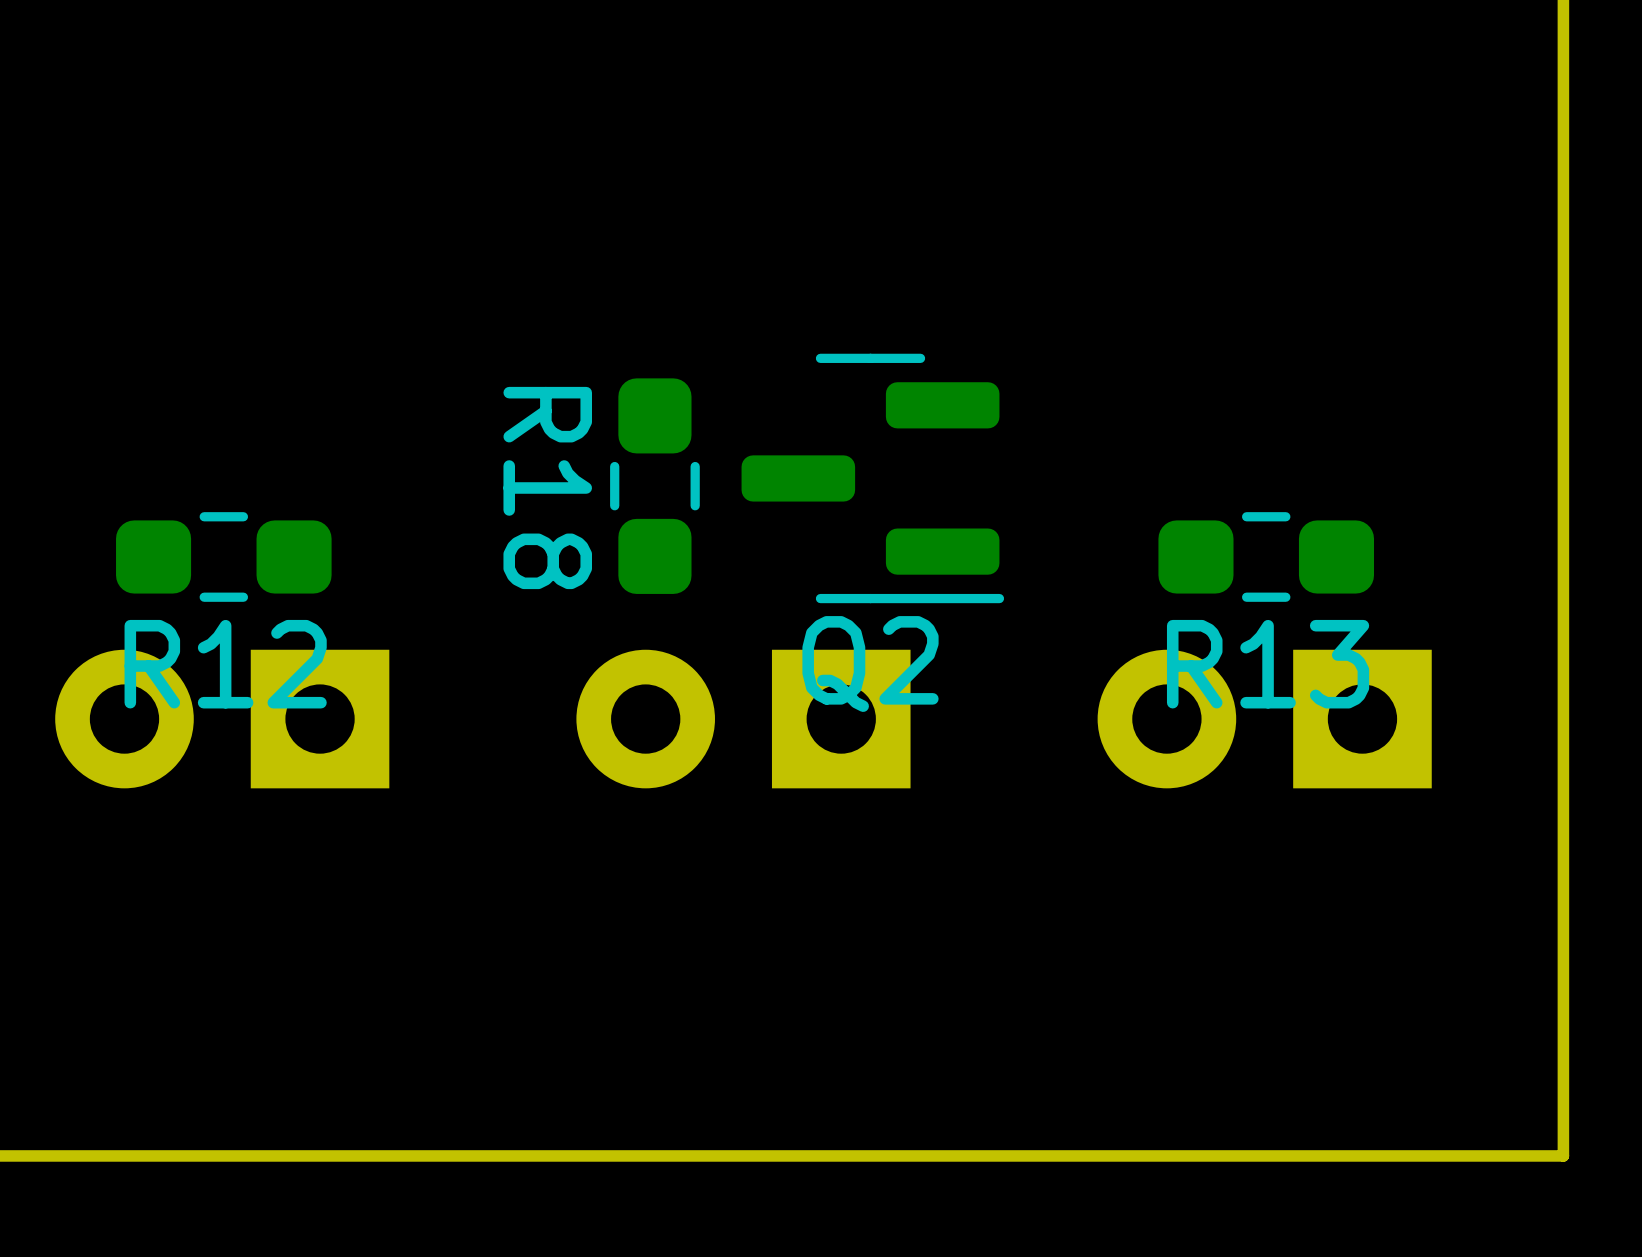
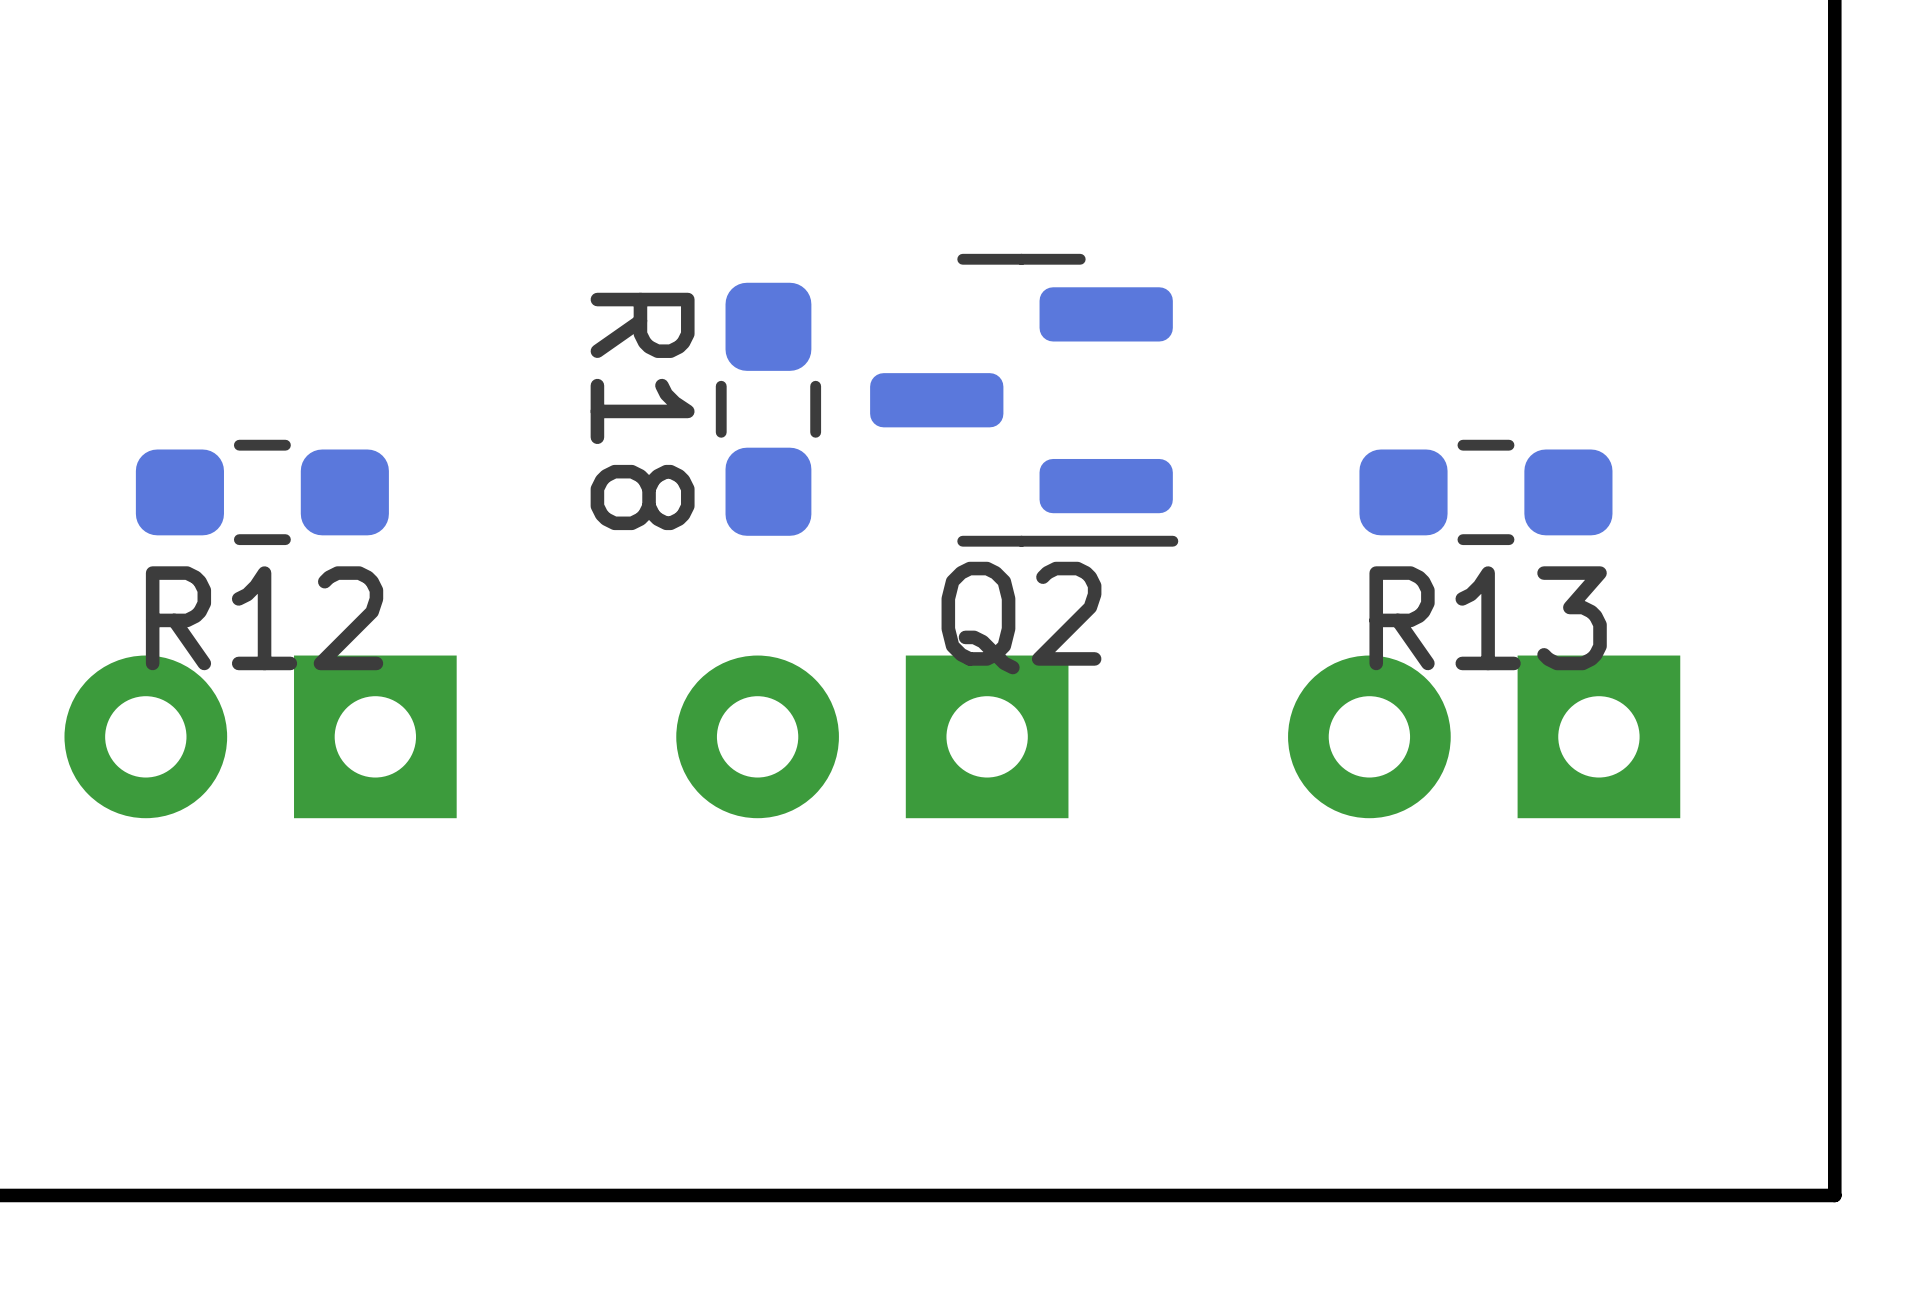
part position: (222, 719) -> (260, 736)
part position: (743, 719) -> (872, 736)
part position: (1264, 719) -> (1484, 736)

